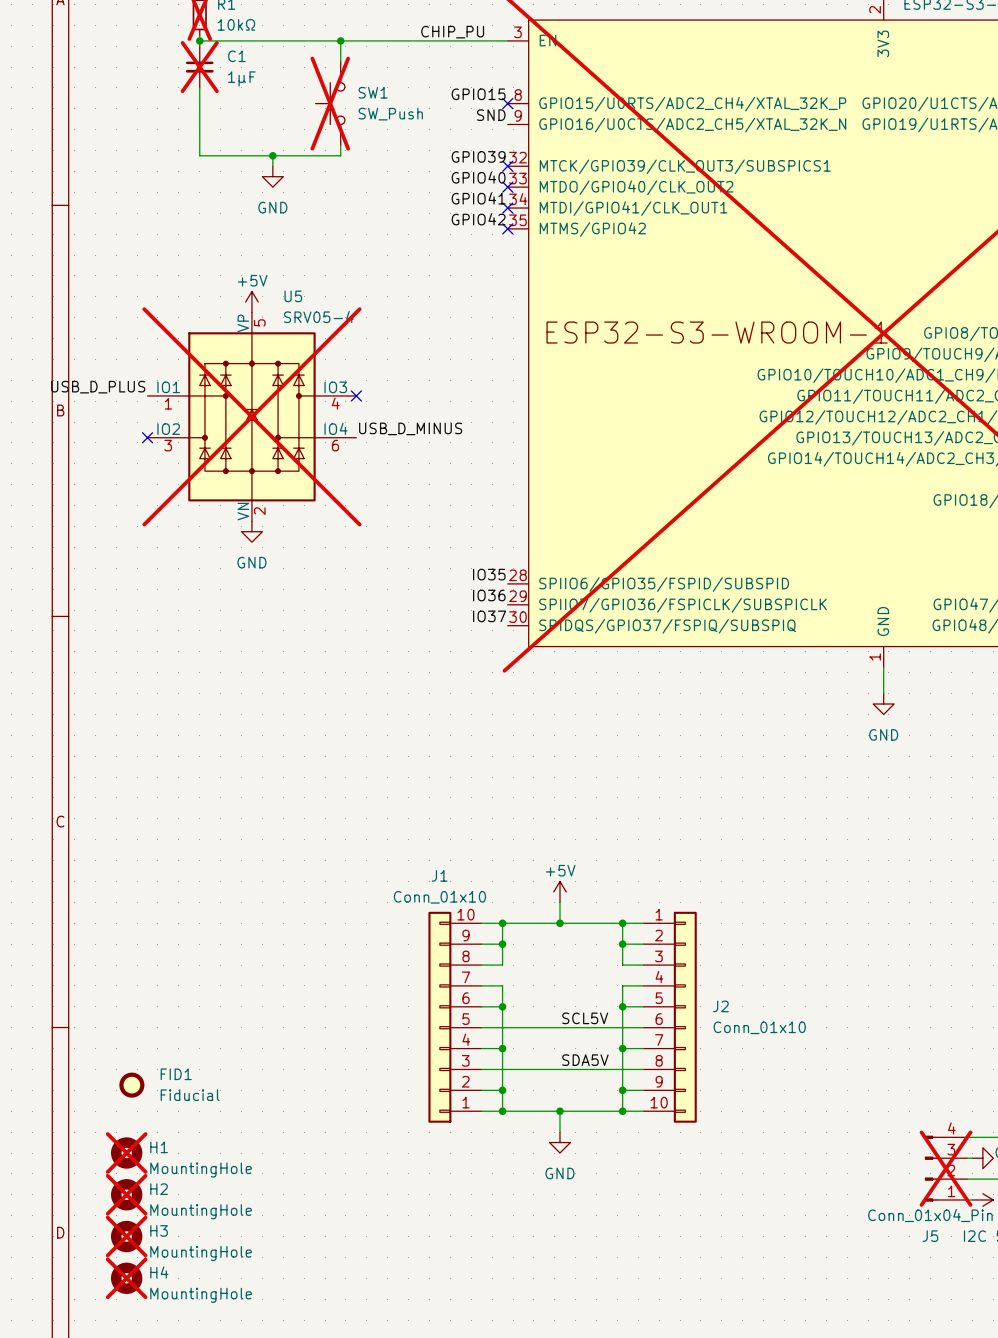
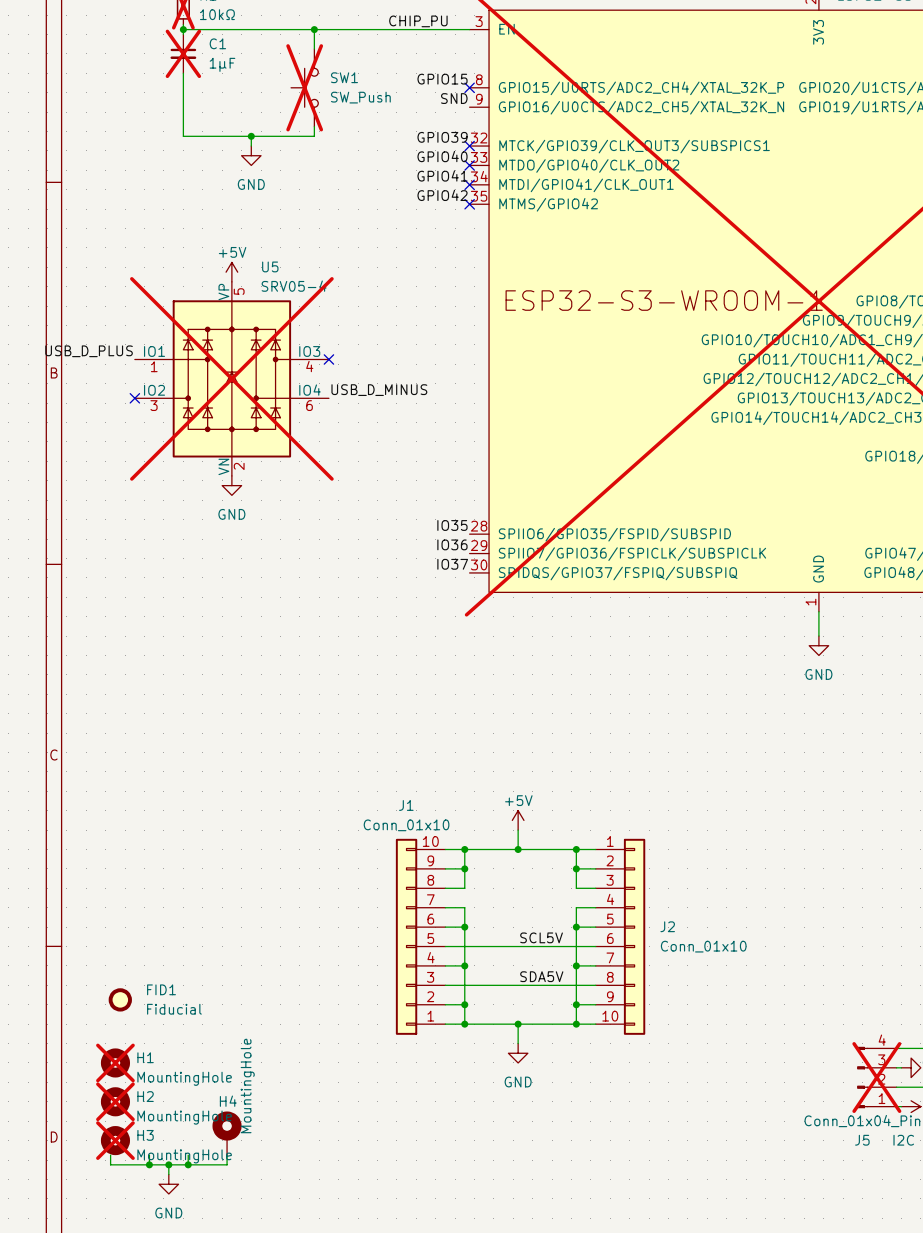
wire: none -> (110, 1155) (110, 1164) (227, 1164) (227, 1155)
wire: none -> (149, 1155) (149, 1164)
wire: none -> (188, 1155) (188, 1164)
H4 symbol: [110, 1262, 143, 1294] -> [212, 1111, 242, 1156]
junction: none -> (149, 1164)
wire: none -> (168, 1164) (168, 1174)
junction: none -> (168, 1164)
junction: none -> (188, 1164)
H4 name position: H4 (159, 1272) -> H4 (228, 1101)
H4 do-not-place cross: (126, 1278) -> none
power symbol: none -> GND (168, 1184)
H4 value position: MountingHole (201, 1295) -> MountingHole (247, 1086)

